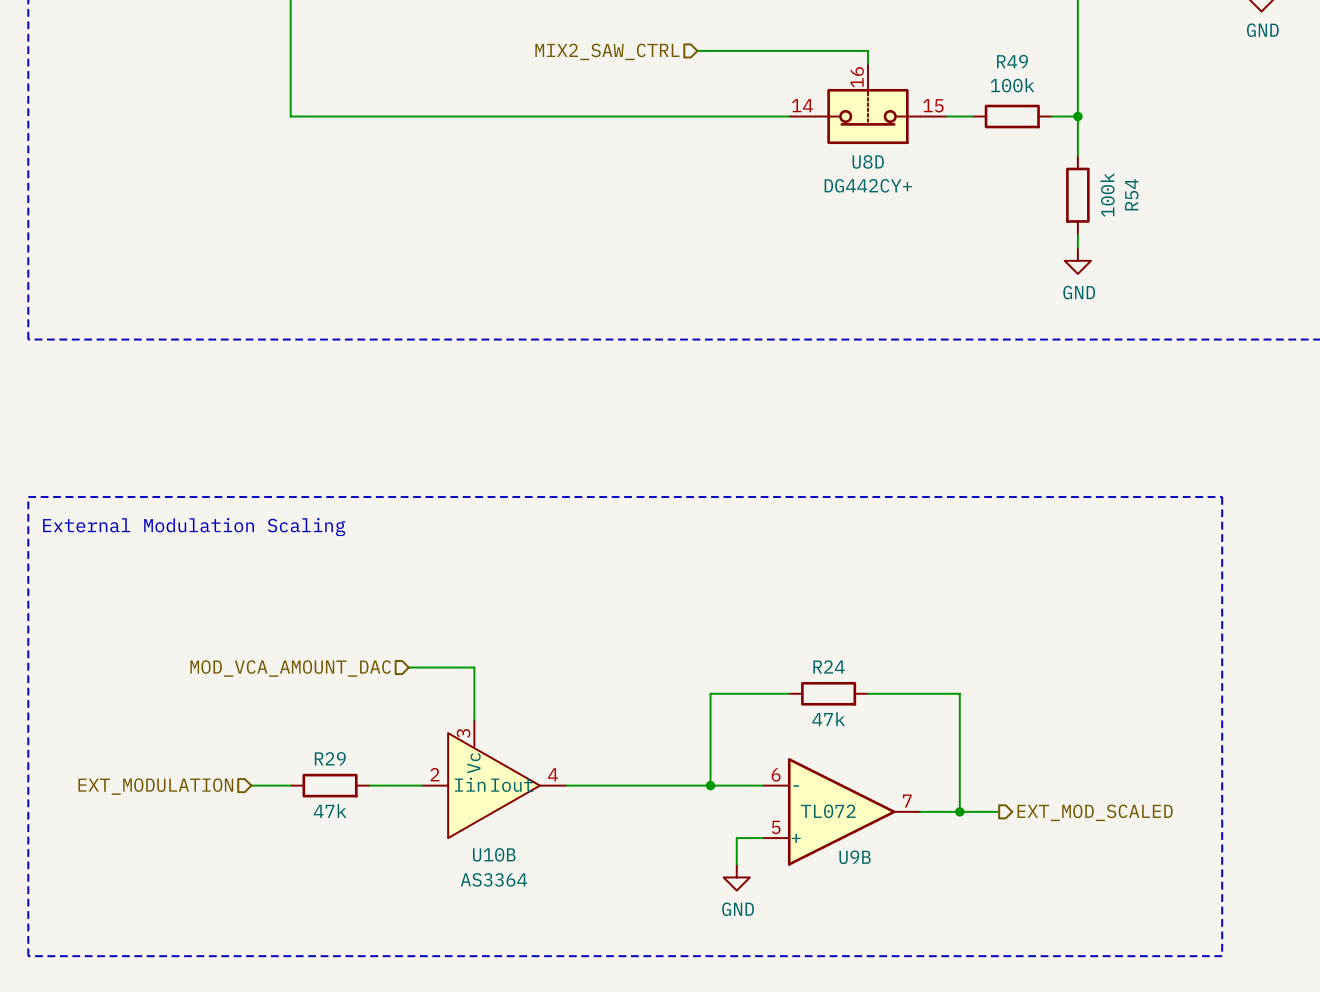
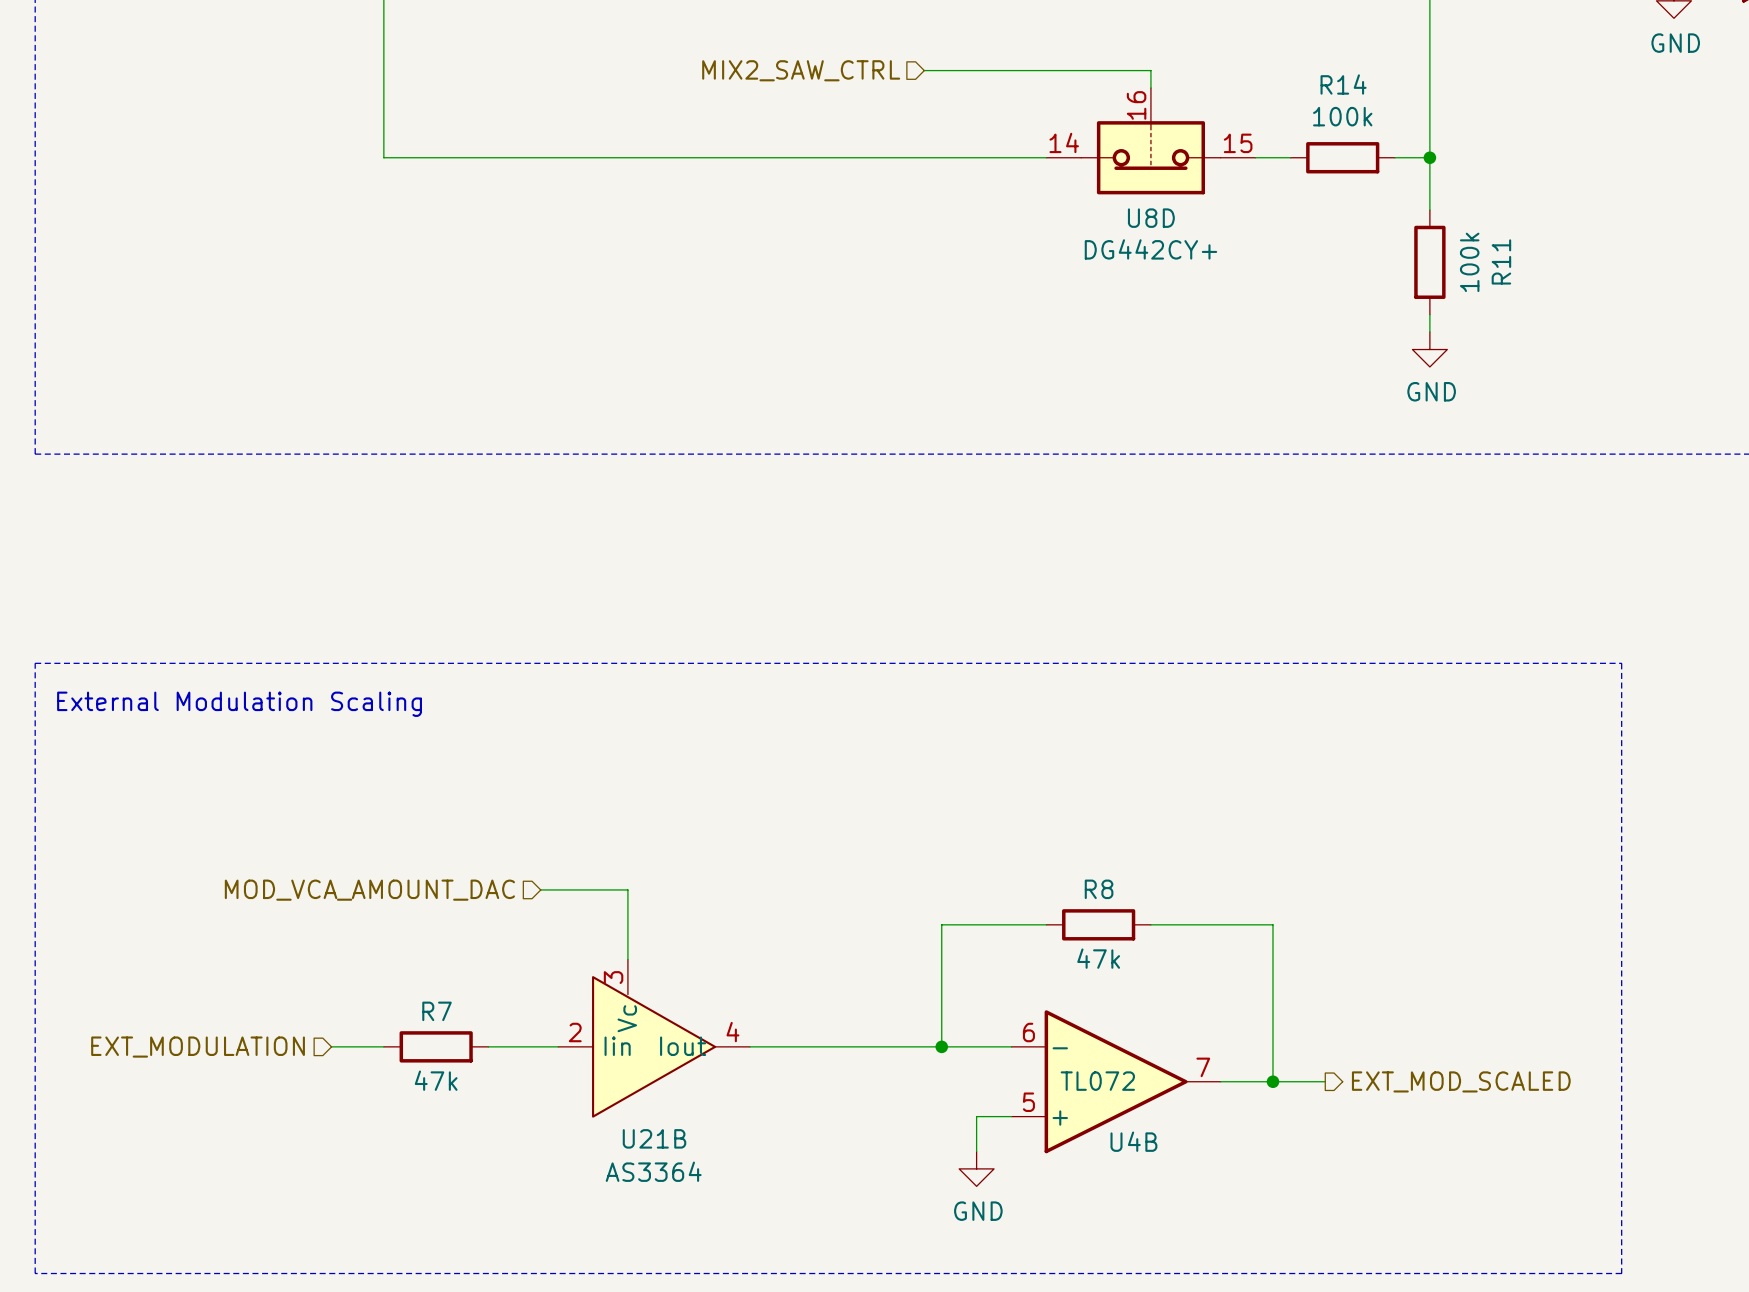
R49 name: R49 (1012, 61) -> R14 (1343, 84)
R54 name: R54 (1131, 194) -> R11 (1501, 261)
R24 name: R24 (829, 666) -> R8 (1099, 889)
R29 name: R29 (330, 758) -> R7 (437, 1011)
U10B name: U10B (494, 854) -> U21B (654, 1138)
U9B name: U9B (855, 857) -> U4B (1133, 1141)

